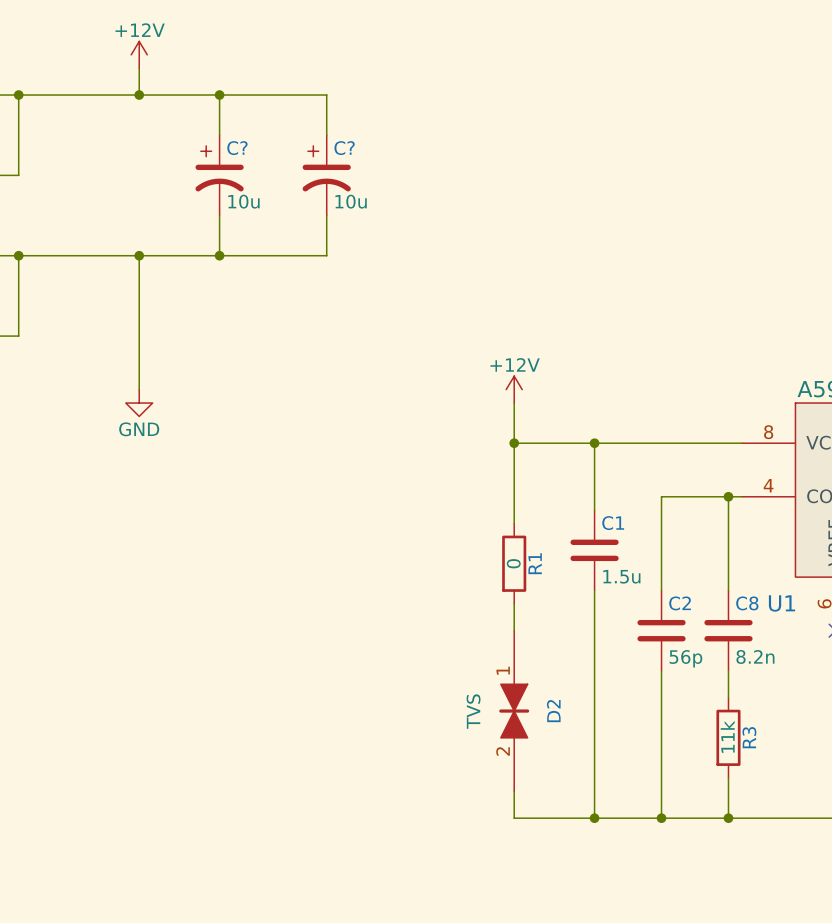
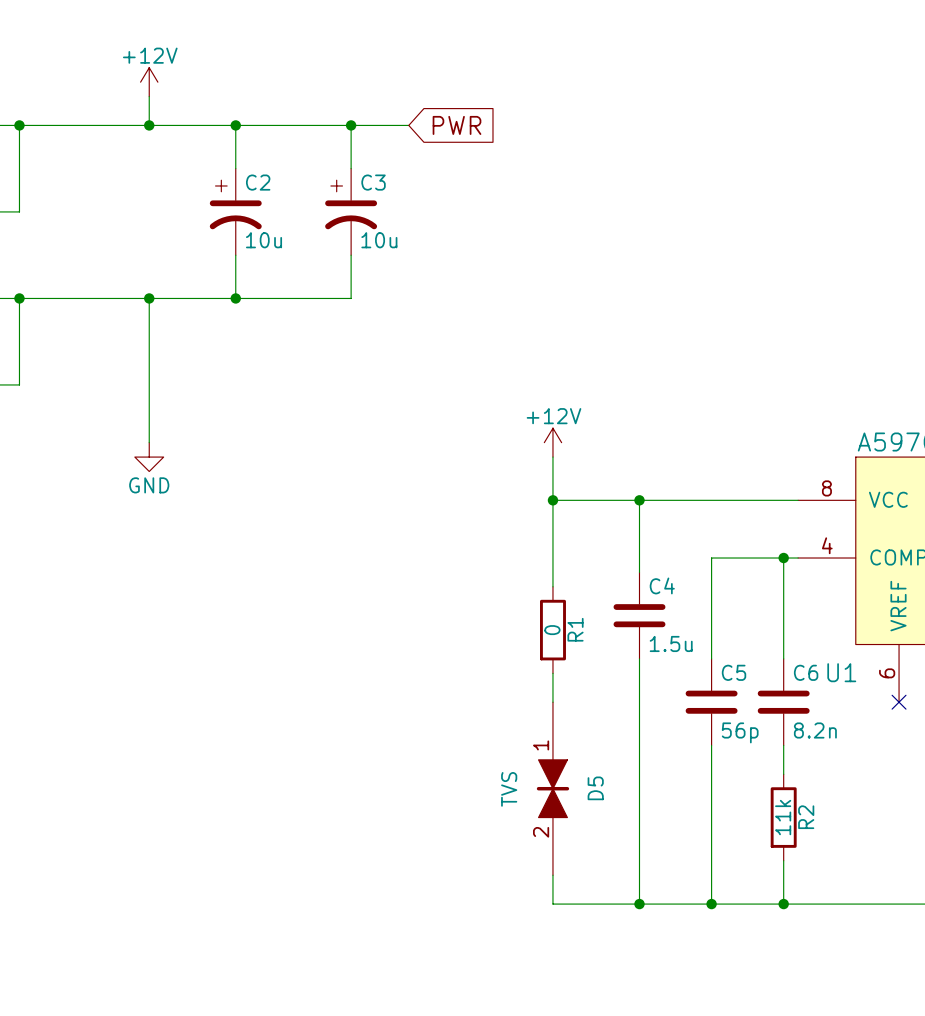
wire: none -> (351, 125) (408, 125)
junction: none -> (351, 125)
global label: none -> PWR (456, 125)
C? name: C? (237, 148) -> C2 (258, 182)
C? name: C? (344, 148) -> C3 (373, 182)
C1 name: C1 (613, 523) -> C4 (662, 585)
C2 name: C2 (680, 603) -> C5 (734, 672)
C8 name: C8 (747, 603) -> C6 (806, 672)
D2 name: D2 (553, 711) -> D5 (595, 788)
R3 name: R3 (749, 737) -> R2 (806, 817)

